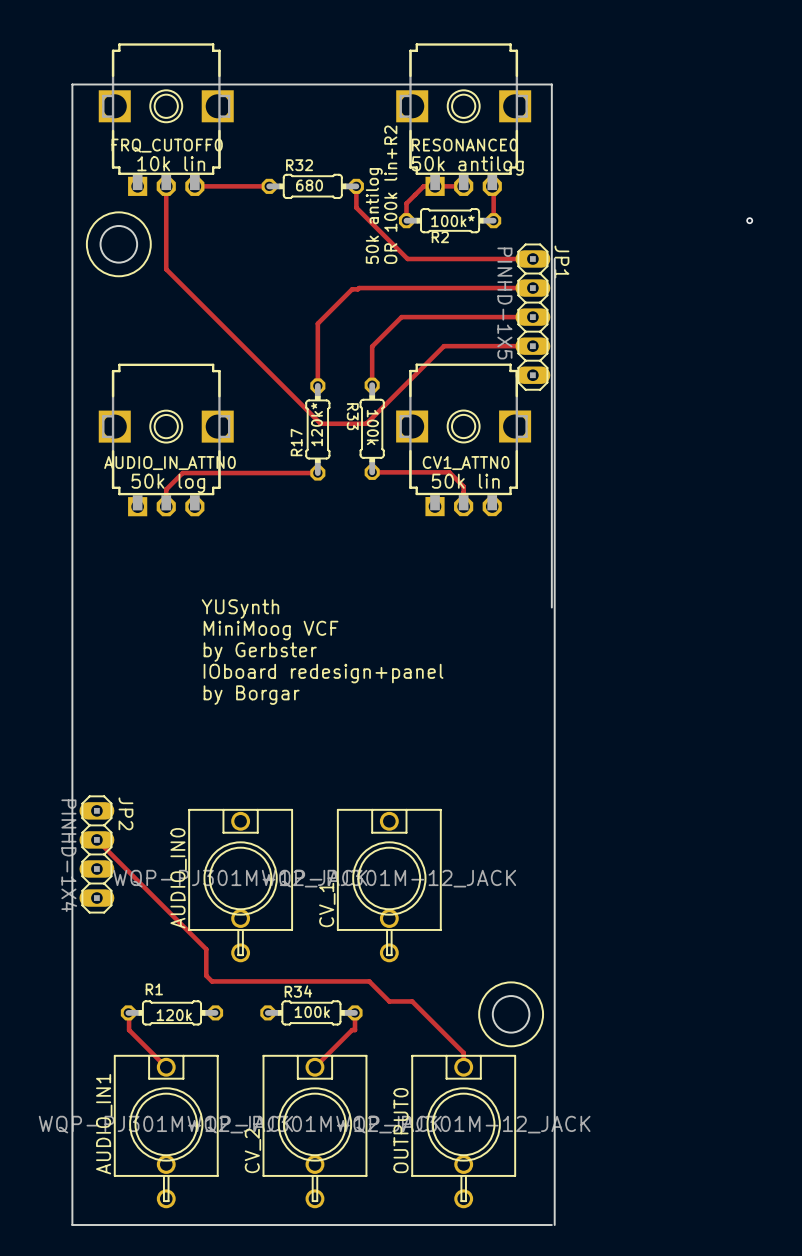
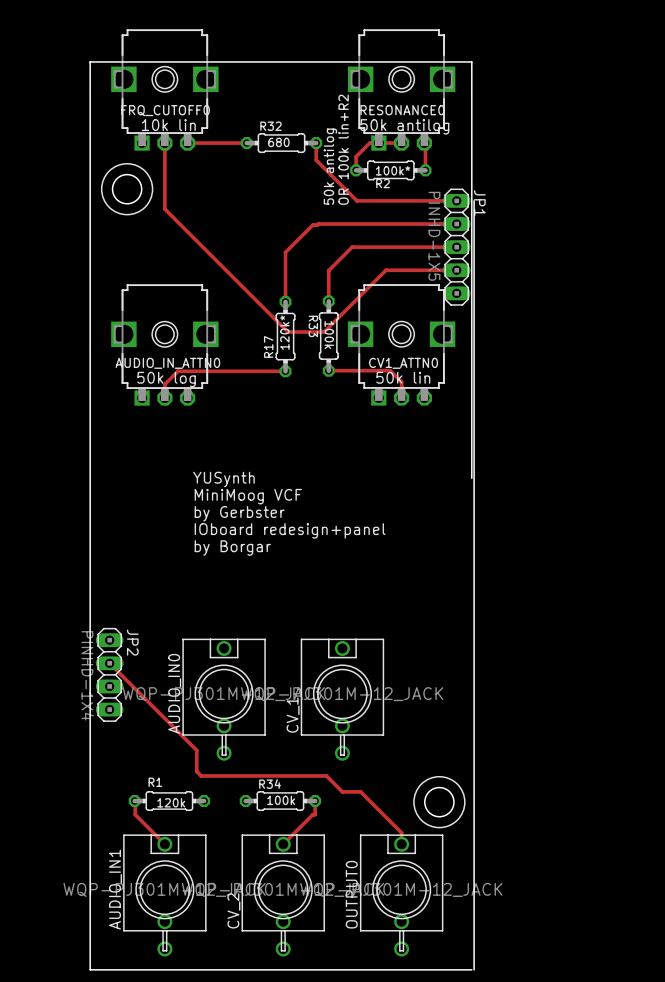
via: (749, 220) -> none

